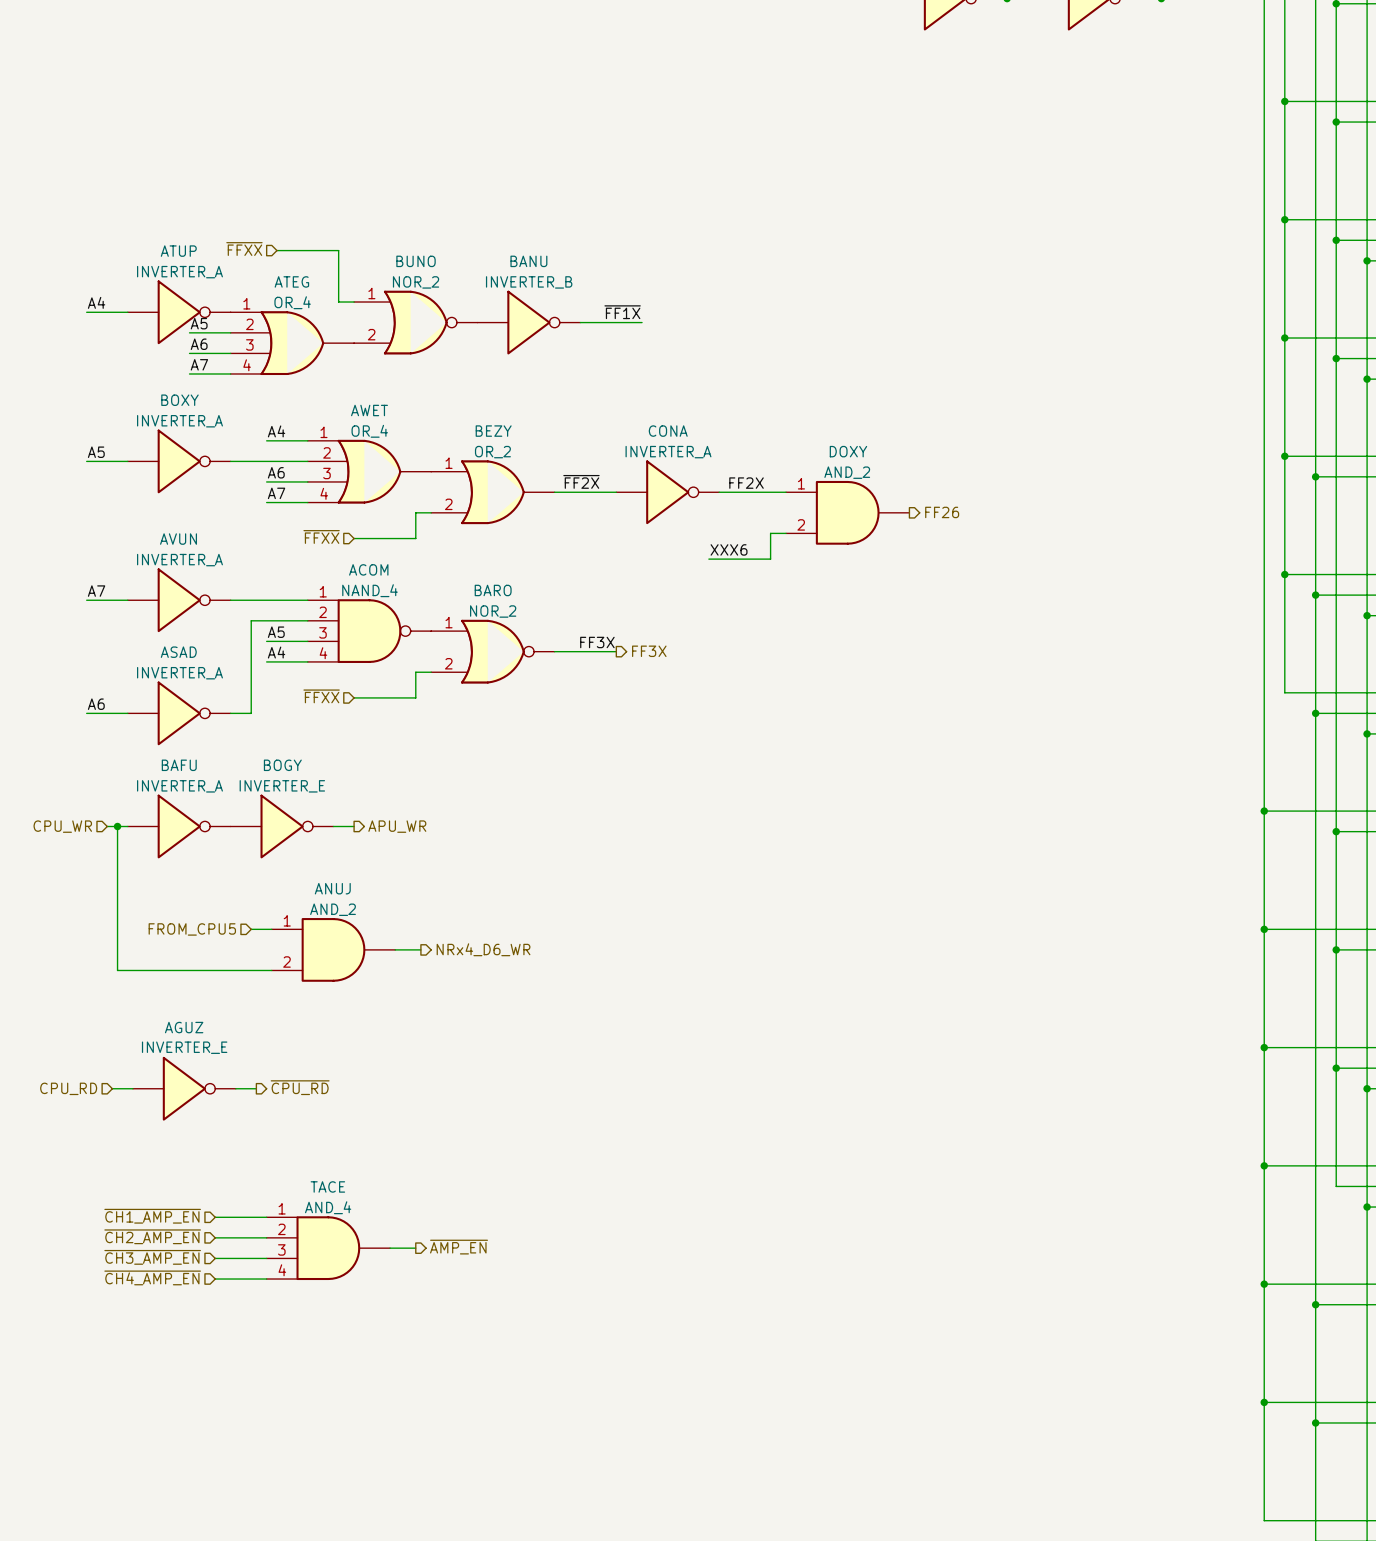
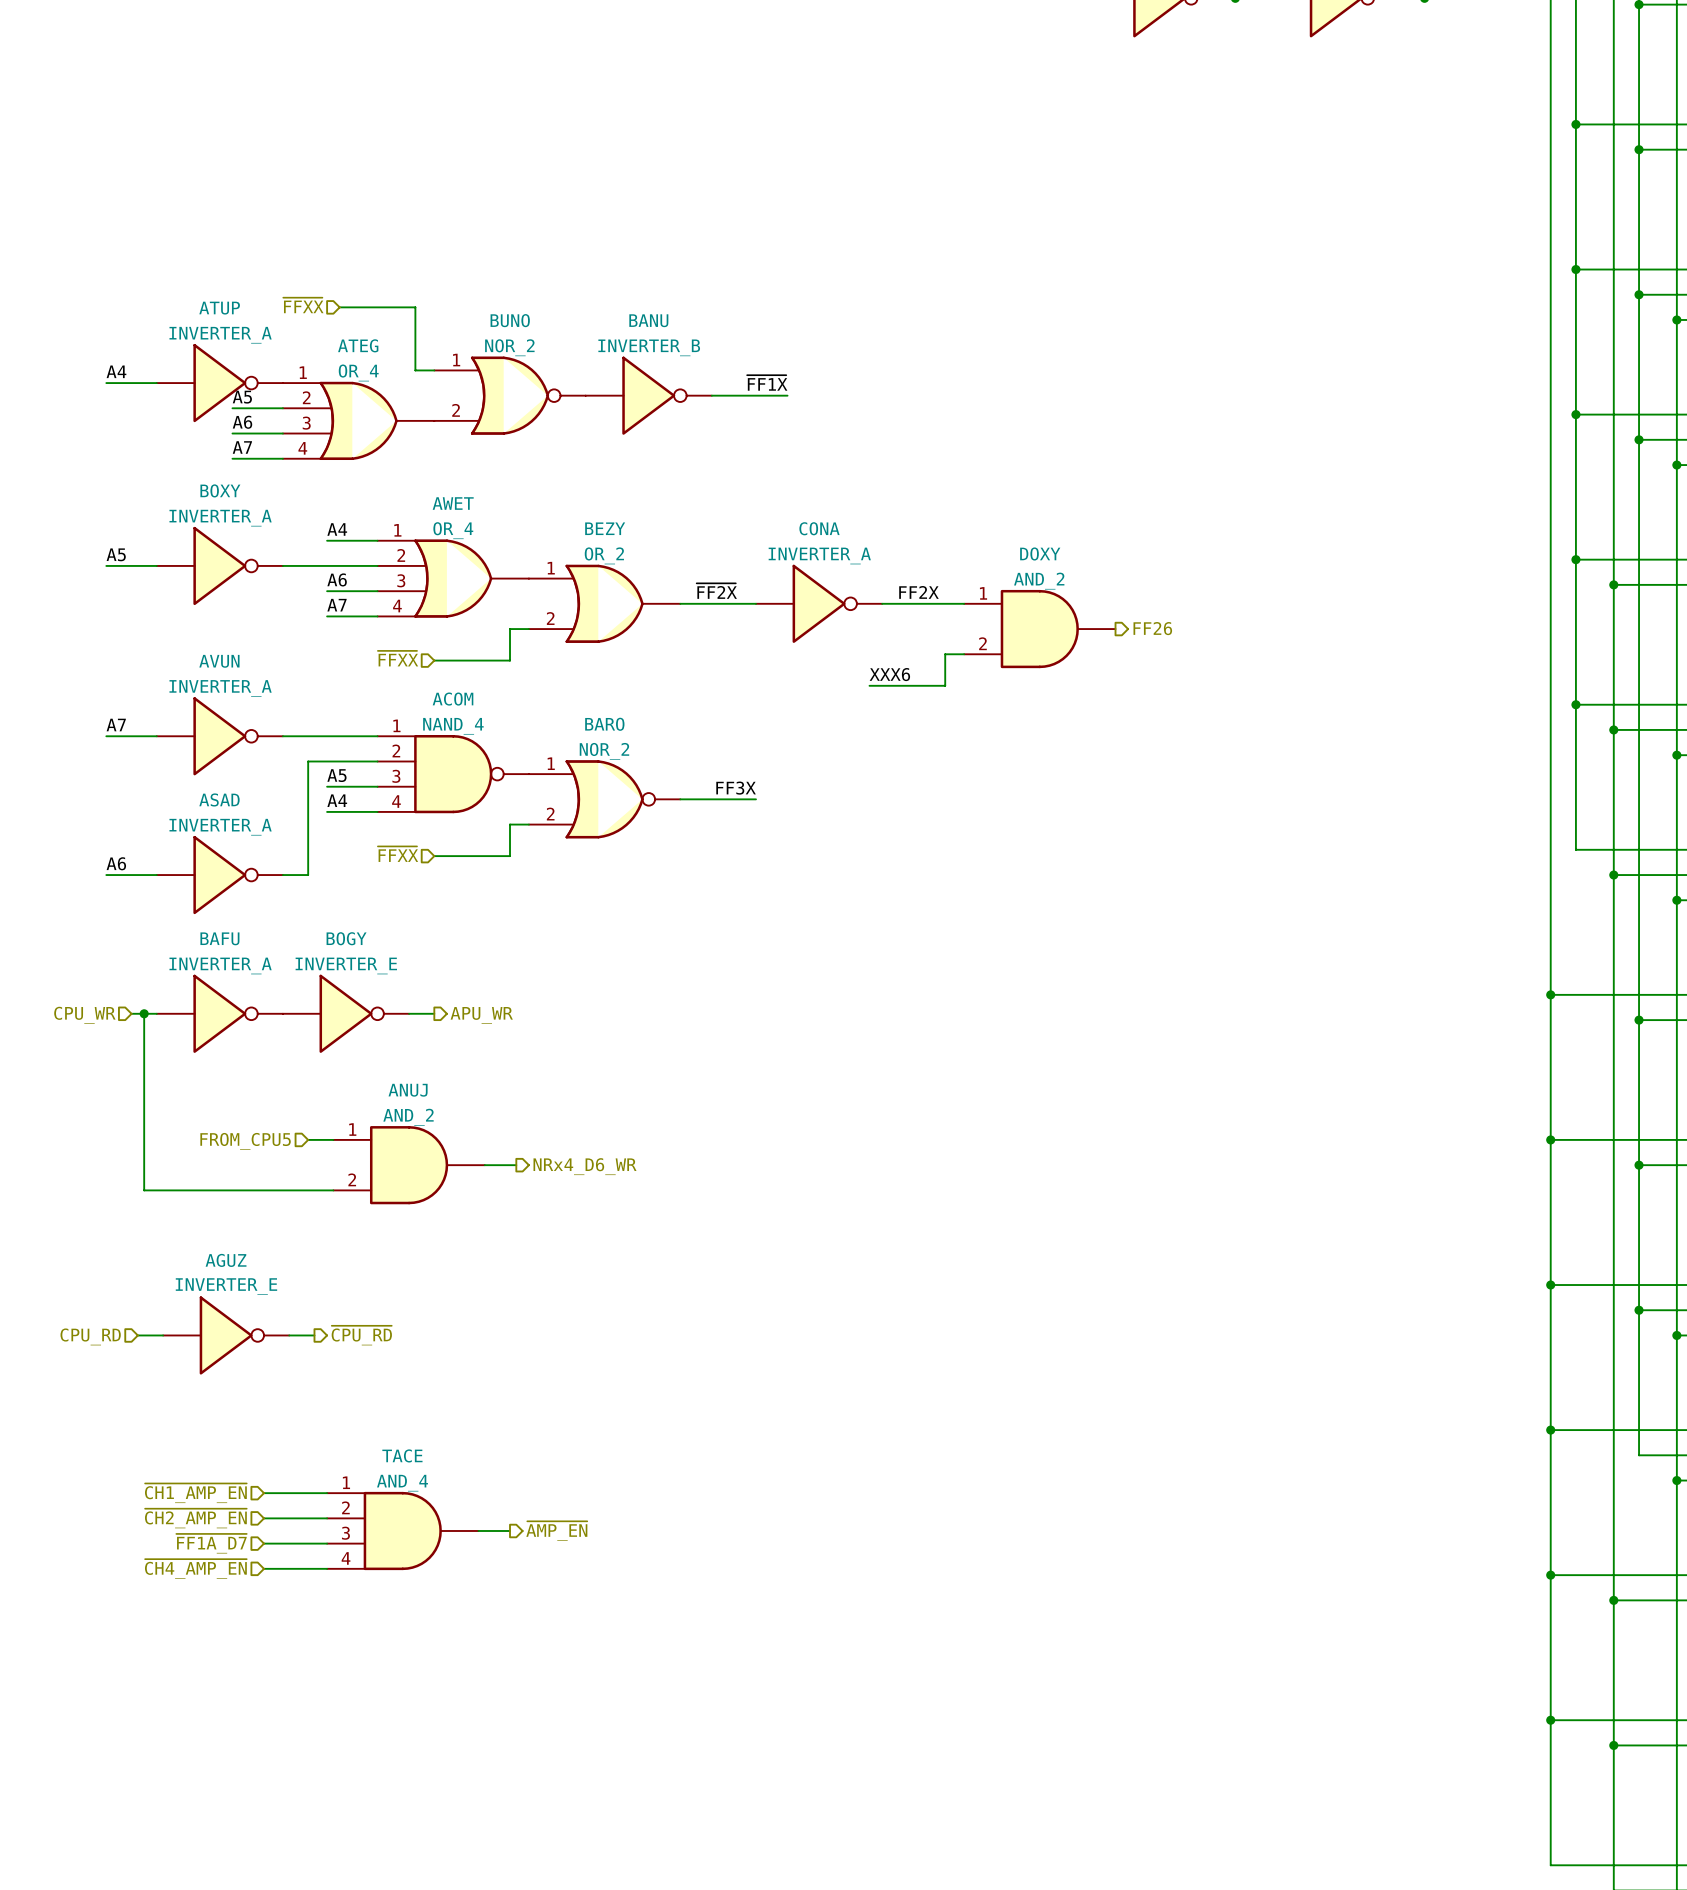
hierarchical label: FF3X (649, 651) -> none
hierarchical label: ~{CH3_AMP_EN} (152, 1257) -> ~{FF1A_D7} (211, 1543)

